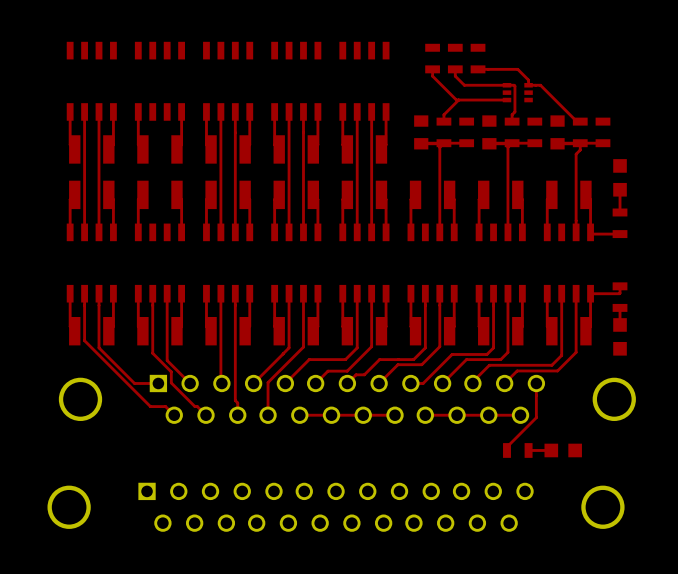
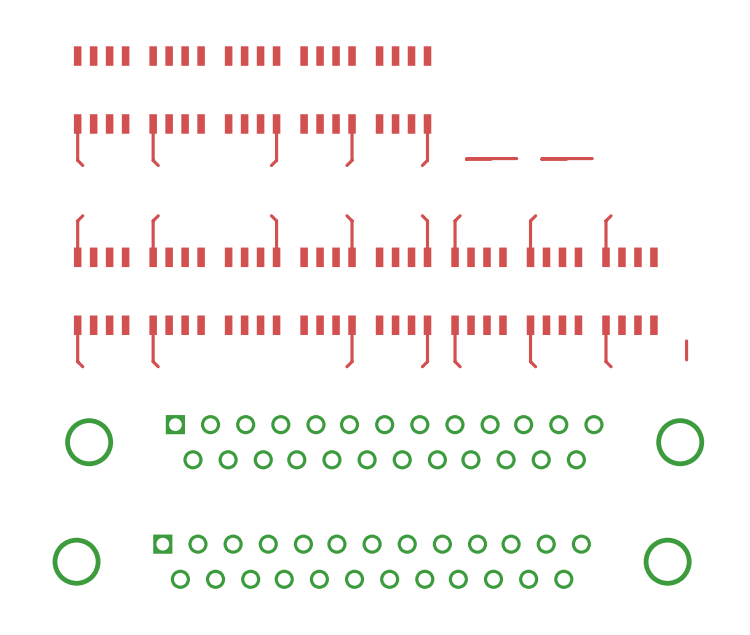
part: (432, 58) -> none
part: (455, 58) -> none
part: (478, 58) -> none
top track: (432, 69) (432, 76) (456, 100) (506, 100) -> none
top track: (455, 69) (455, 76) (464, 85) (514, 85) (514, 111) (512, 114) (512, 121) -> none
top track: (478, 69) (517, 69) (528, 80) (528, 85) (540, 85) (576, 121) (580, 121) -> none
part: (517, 92) -> none
top track: (458, 100) (443, 114) (443, 121) -> none
top track: (84, 111) (84, 232) -> none
top track: (99, 111) (99, 232) -> none
top track: (113, 111) (113, 144) (108, 149) -> none
top track: (181, 111) (181, 144) (176, 149) -> none
top track: (206, 111) (206, 144) (211, 149) -> none
top track: (220, 111) (220, 232) -> none
top track: (235, 111) (235, 232) -> none
top track: (274, 111) (274, 144) (279, 149) -> none
top track: (289, 111) (289, 232) -> none
top track: (303, 111) (303, 232) -> none
top track: (342, 111) (342, 144) (347, 149) -> none
top track: (357, 111) (357, 232) -> none
top track: (371, 111) (371, 232) -> none
part: (421, 132) -> none
part: (443, 132) -> none
part: (466, 132) -> none
part: (489, 132) -> none
part: (512, 132) -> none
part: (534, 132) -> none
part: (557, 132) -> none
part: (580, 132) -> none
part: (602, 132) -> none
top track: (443, 143) (439, 147) (439, 232) -> none
top track: (512, 143) (507, 147) (507, 232) -> none
top track: (602, 143) (558, 143) (557, 143) (579, 143) (580, 143) (580, 150) (576, 154) (576, 232) -> none
part: (91, 149) -> none
part: (159, 149) -> none
part: (228, 149) -> none
part: (296, 149) -> none
part: (364, 149) -> none
part: (620, 177) -> none
top track: (620, 189) (620, 212) -> none
part: (91, 194) -> none
top track: (108, 194) (113, 199) (113, 232) -> none
part: (159, 194) -> none
top track: (176, 194) (181, 199) (181, 232) -> none
top track: (211, 194) (206, 199) (206, 232) -> none
part: (228, 194) -> none
top track: (279, 194) (274, 199) (274, 232) -> none
part: (296, 194) -> none
top track: (347, 194) (342, 199) (342, 232) -> none
part: (364, 194) -> none
part: (432, 194) -> none
top track: (449, 194) (454, 199) (454, 232) -> none
part: (500, 194) -> none
top track: (517, 194) (522, 199) (522, 232) -> none
part: (568, 194) -> none
top track: (585, 194) (590, 199) (590, 232) (592, 234) (620, 234) -> none
part: (620, 223) -> none
top track: (620, 286) (619, 293) (590, 293) (590, 326) (585, 331) -> none
top track: (84, 293) (84, 340) (150, 406) (165, 406) (174, 415) -> none
top track: (99, 293) (99, 347) (134, 383) (158, 383) -> none
top track: (113, 293) (113, 326) (108, 331) -> none
top track: (152, 293) (152, 353) (171, 371) (171, 382) (206, 415) -> none
top track: (167, 293) (167, 360) (190, 383) -> none
top track: (181, 293) (181, 326) (176, 331) -> none
top track: (206, 293) (206, 326) (211, 331) -> none
top track: (220, 293) (221, 383) -> none
top track: (235, 293) (235, 400) (237, 402) (237, 415) -> none
top track: (249, 293) (249, 326) -> none
top track: (274, 293) (274, 326) (279, 331) -> none
top track: (289, 293) (289, 347) (283, 353) -> none
top track: (303, 293) (303, 347) (268, 382) (268, 415) -> none
top track: (342, 293) (342, 326) (347, 331) -> none
top track: (357, 293) (357, 347) (345, 359) (309, 359) (285, 383) -> none
top track: (371, 293) (371, 346) (347, 371) (328, 371) (315, 383) -> none
top track: (425, 293) (425, 347) (413, 359) (379, 359) (364, 374) (356, 374) (347, 383) -> none
top track: (439, 293) (439, 346) (421, 364) (397, 364) (379, 383) -> none
top track: (454, 293) (454, 326) (449, 331) -> none
top track: (493, 293) (493, 347) (486, 354) (452, 354) (423, 383) (410, 383) -> none
top track: (507, 293) (507, 352) (500, 359) (466, 359) (442, 383) -> none
top track: (522, 293) (522, 326) (517, 331) -> none
top track: (561, 293) (561, 355) (551, 365) (489, 365) (472, 383) -> none
top track: (576, 293) (576, 352) (557, 370) (517, 370) (504, 383) -> none
part: (620, 297) -> none
part: (91, 331) -> none
part: (159, 331) -> none
part: (228, 331) -> none
part: (296, 331) -> none
part: (364, 331) -> none
part: (432, 331) -> none
part: (500, 331) -> none
part: (568, 331) -> none
part: (620, 336) -> none
top track: (283, 353) (253, 383) -> none
top track: (536, 383) (536, 417) (506, 447) (506, 450) -> none
top track: (395, 415) (299, 415) -> none
top track: (520, 415) (425, 415) -> none
part: (517, 450) -> none
top track: (551, 450) (528, 450) -> none
part: (563, 450) -> none

